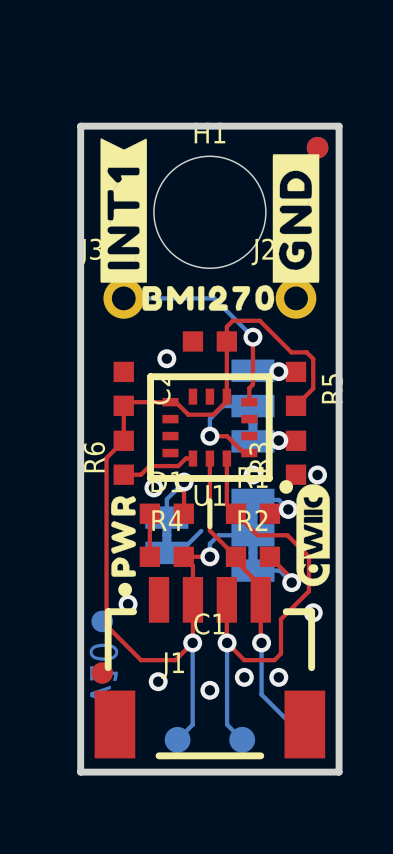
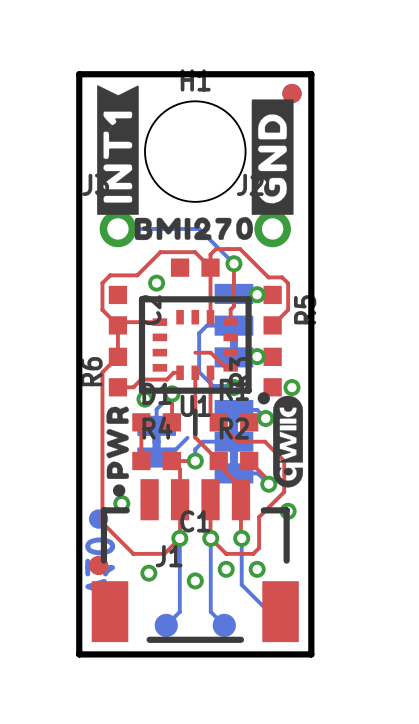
top track: none -> (210, 267) (195, 252) (160, 252) (137, 275) (110, 275) (102, 283) (102, 309) (114, 322)
top track: (226, 396) (226, 401) (213, 414) (188, 414) (175, 402) (170, 402) -> none
bottom track: (214, 414) (209, 418) (209, 436) -> (199, 333) (199, 372) (213, 385) (226, 385)
via: (209, 436) -> none

